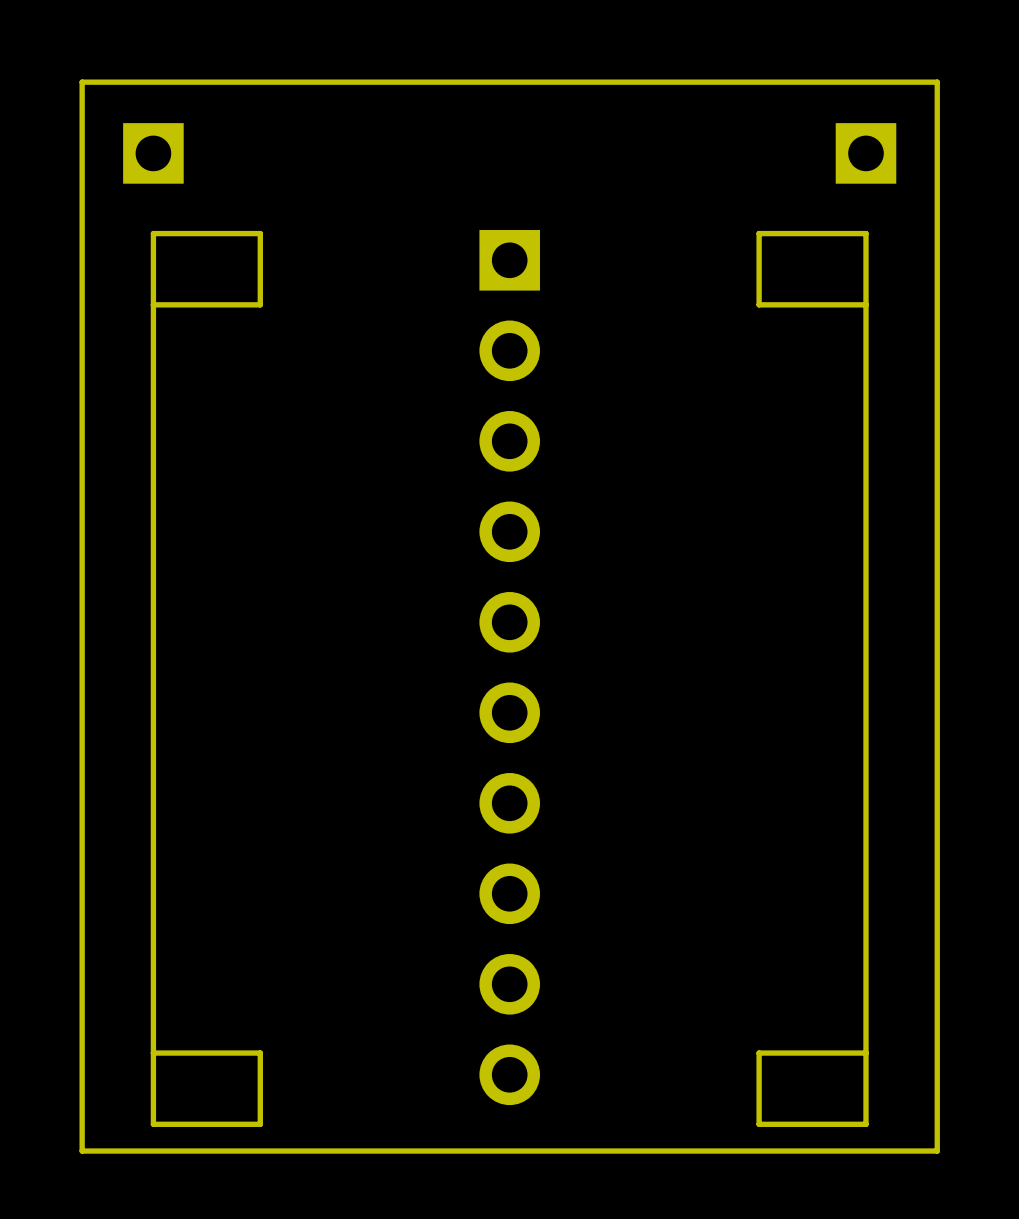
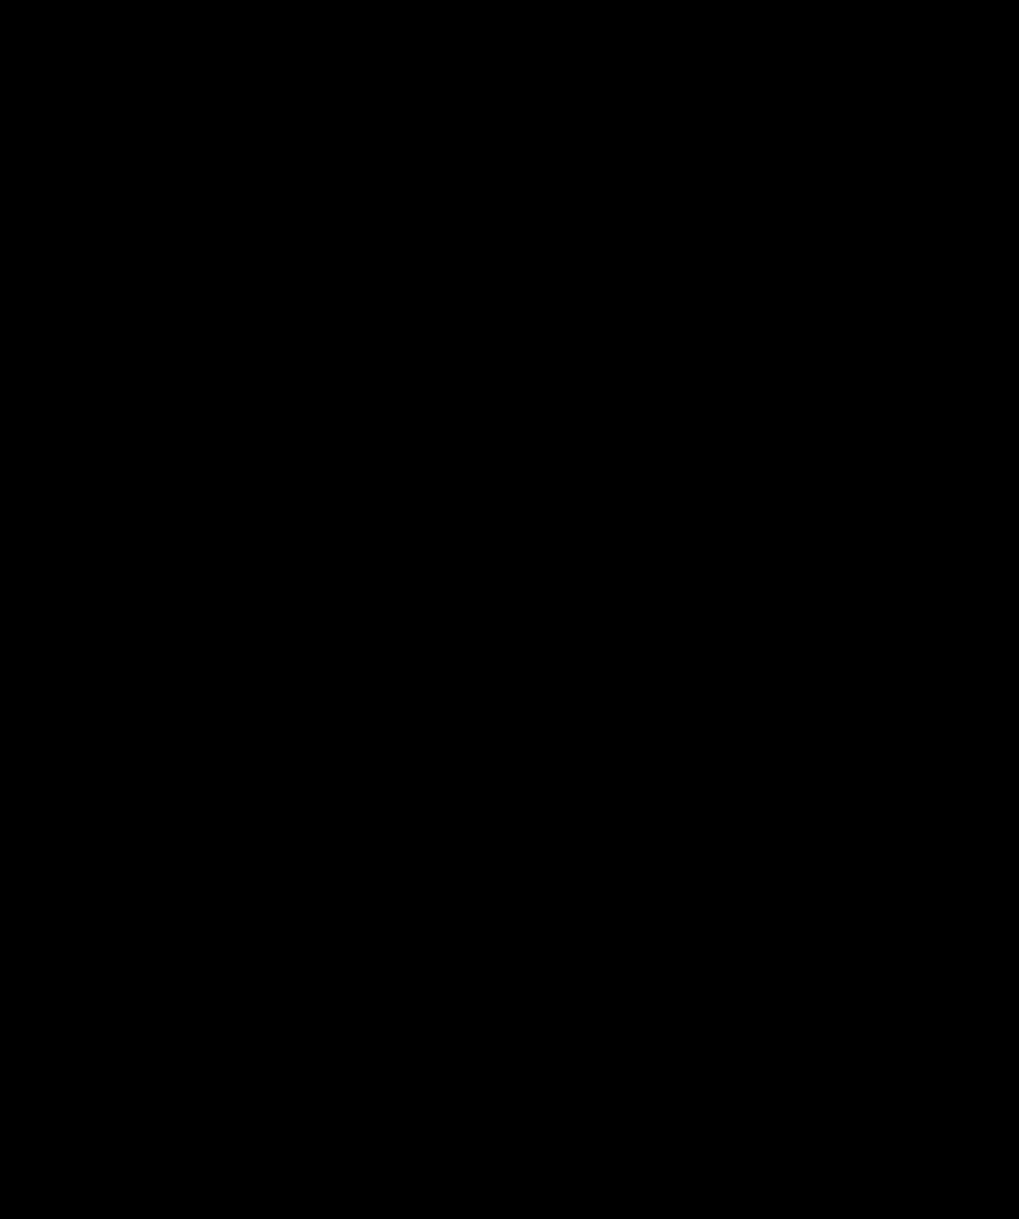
board edge: (937, 82) (937, 1151) (82, 1151) (82, 82) (937, 82) -> none
part: (153, 153) -> none
part: (866, 153) -> none
board edge: (153, 304) (260, 304) (260, 233) (153, 233) (153, 1124) (260, 1124) (260, 1053) (153, 1053) -> none
board edge: (866, 304) (759, 304) (759, 233) (866, 233) (866, 1124) (759, 1124) (759, 1053) (866, 1053) -> none
part: (509, 667) -> none

